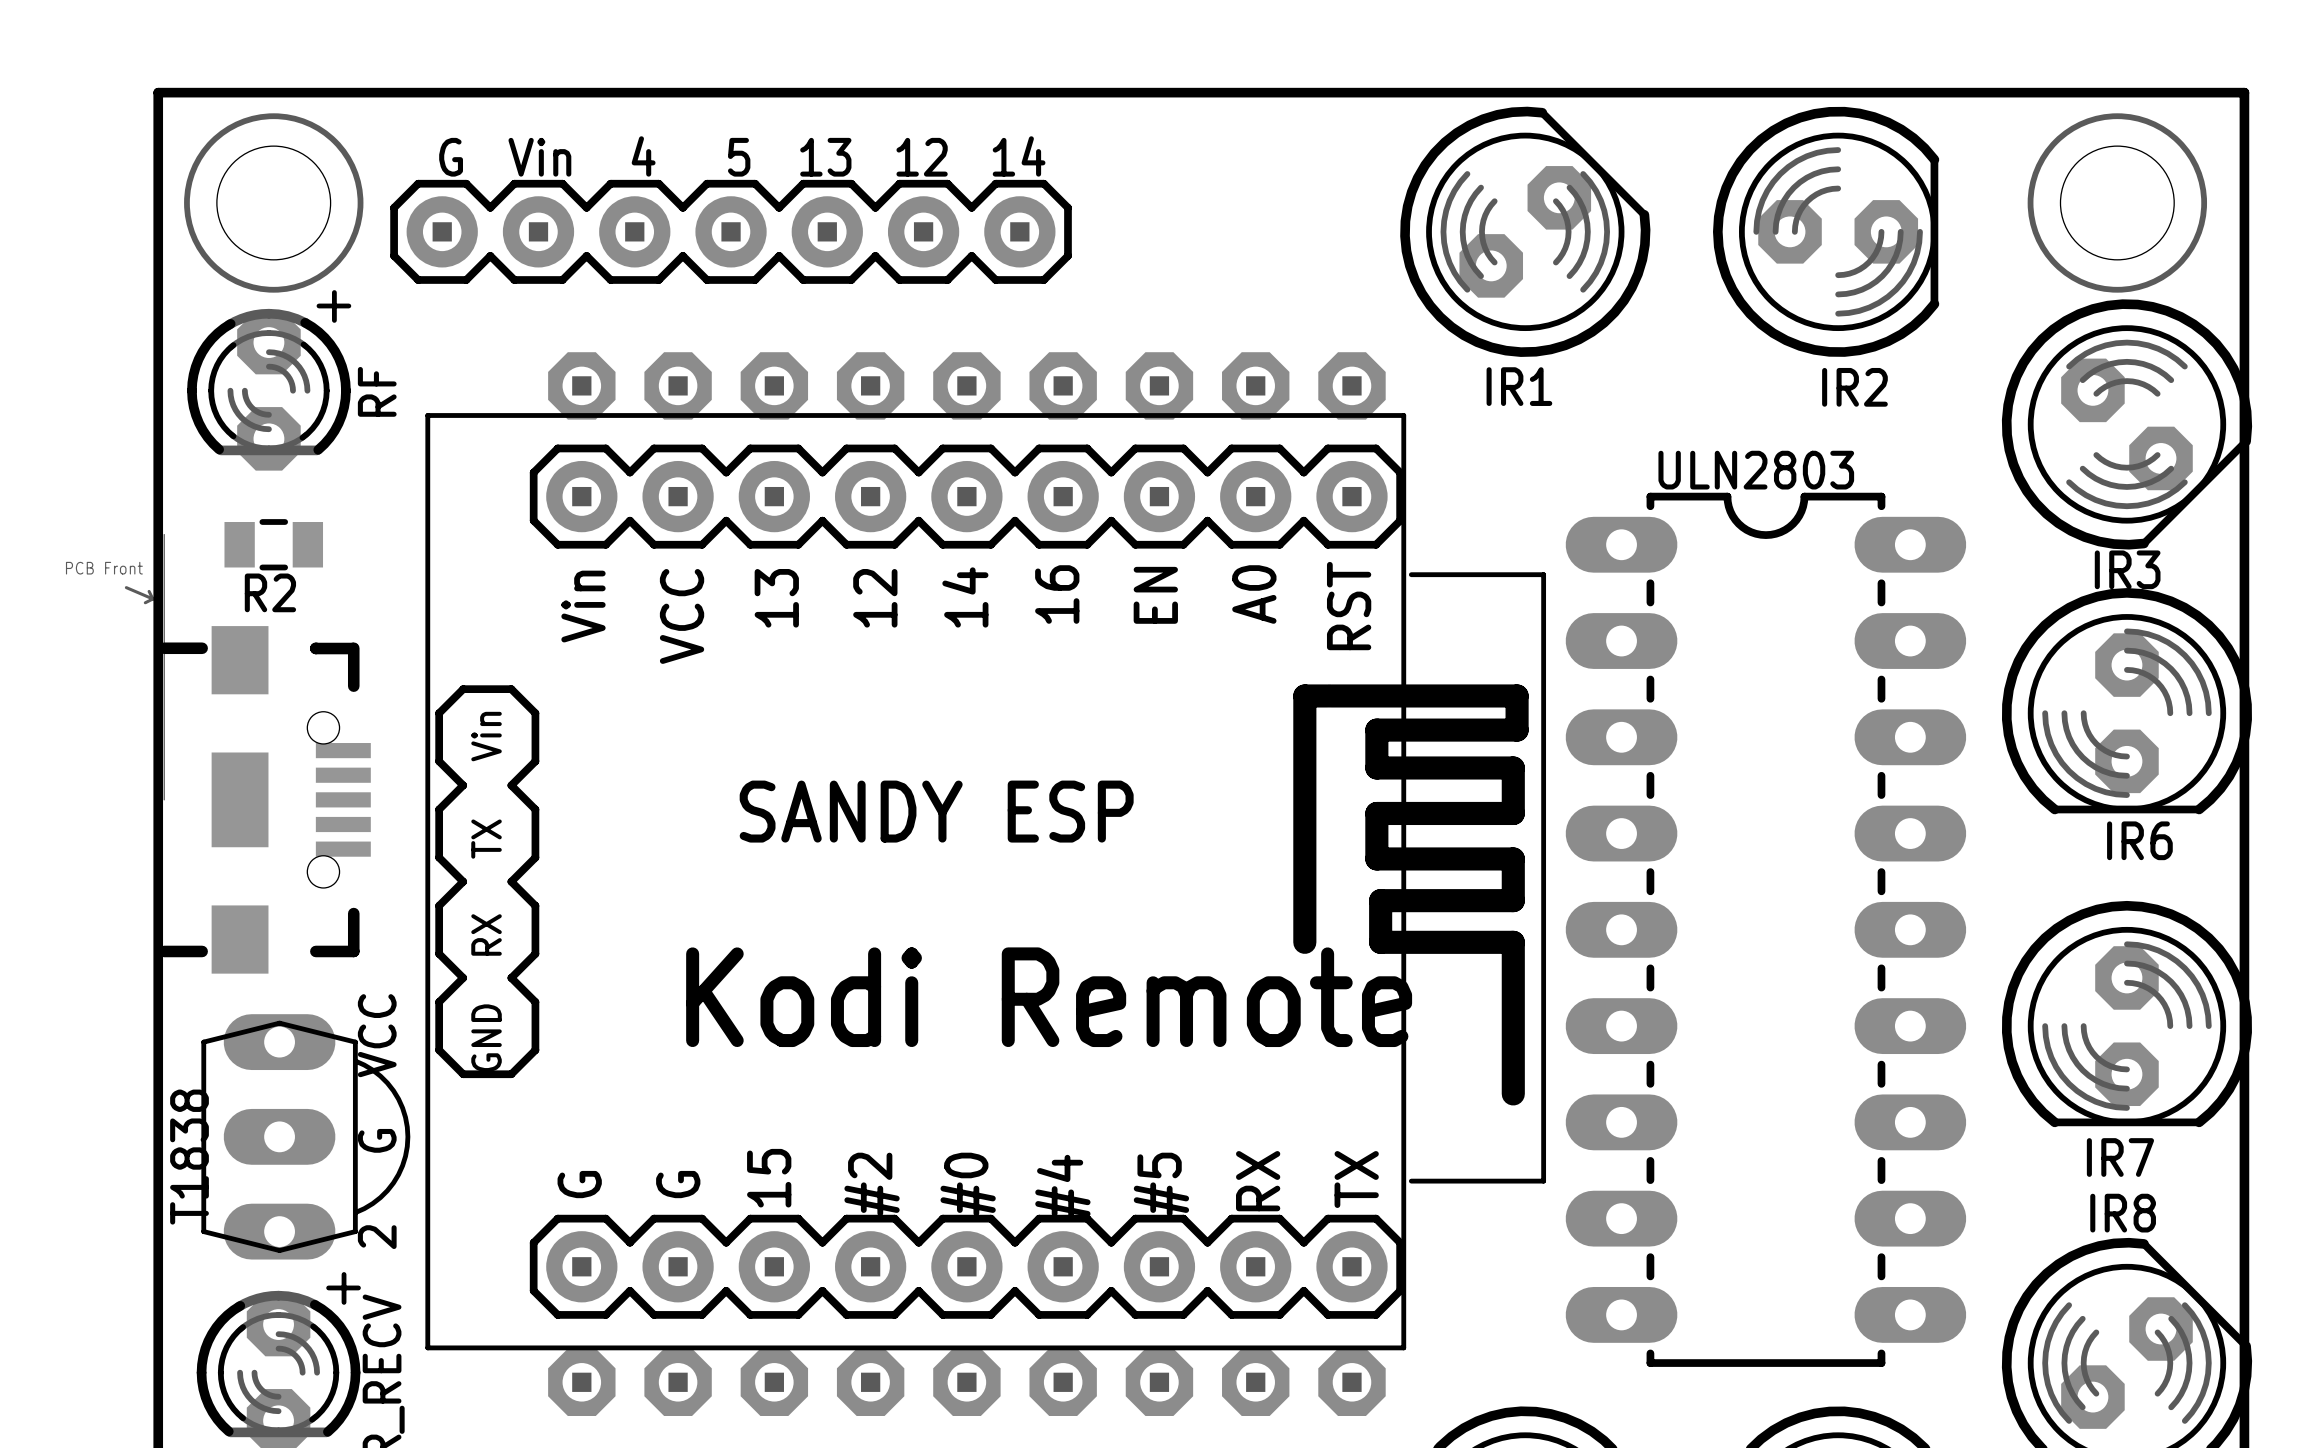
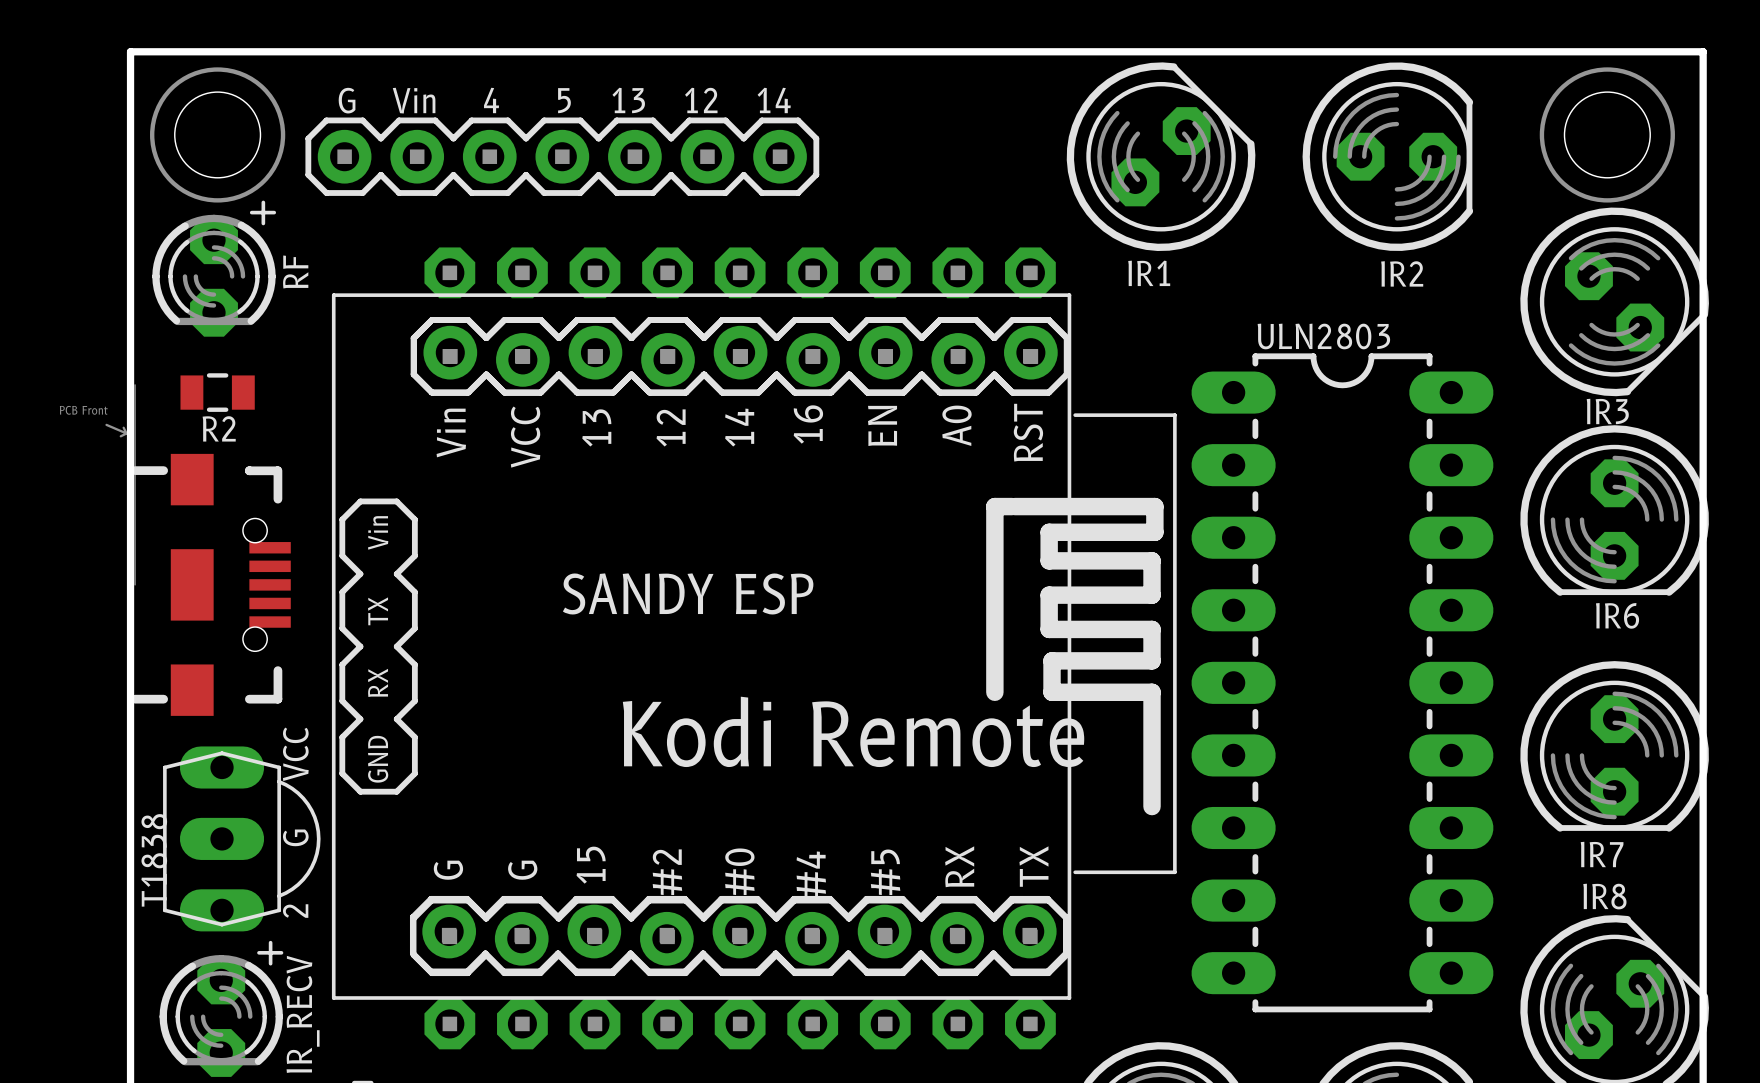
part footprint: [425, 413, 1547, 1351] -> [331, 293, 1177, 1000]

